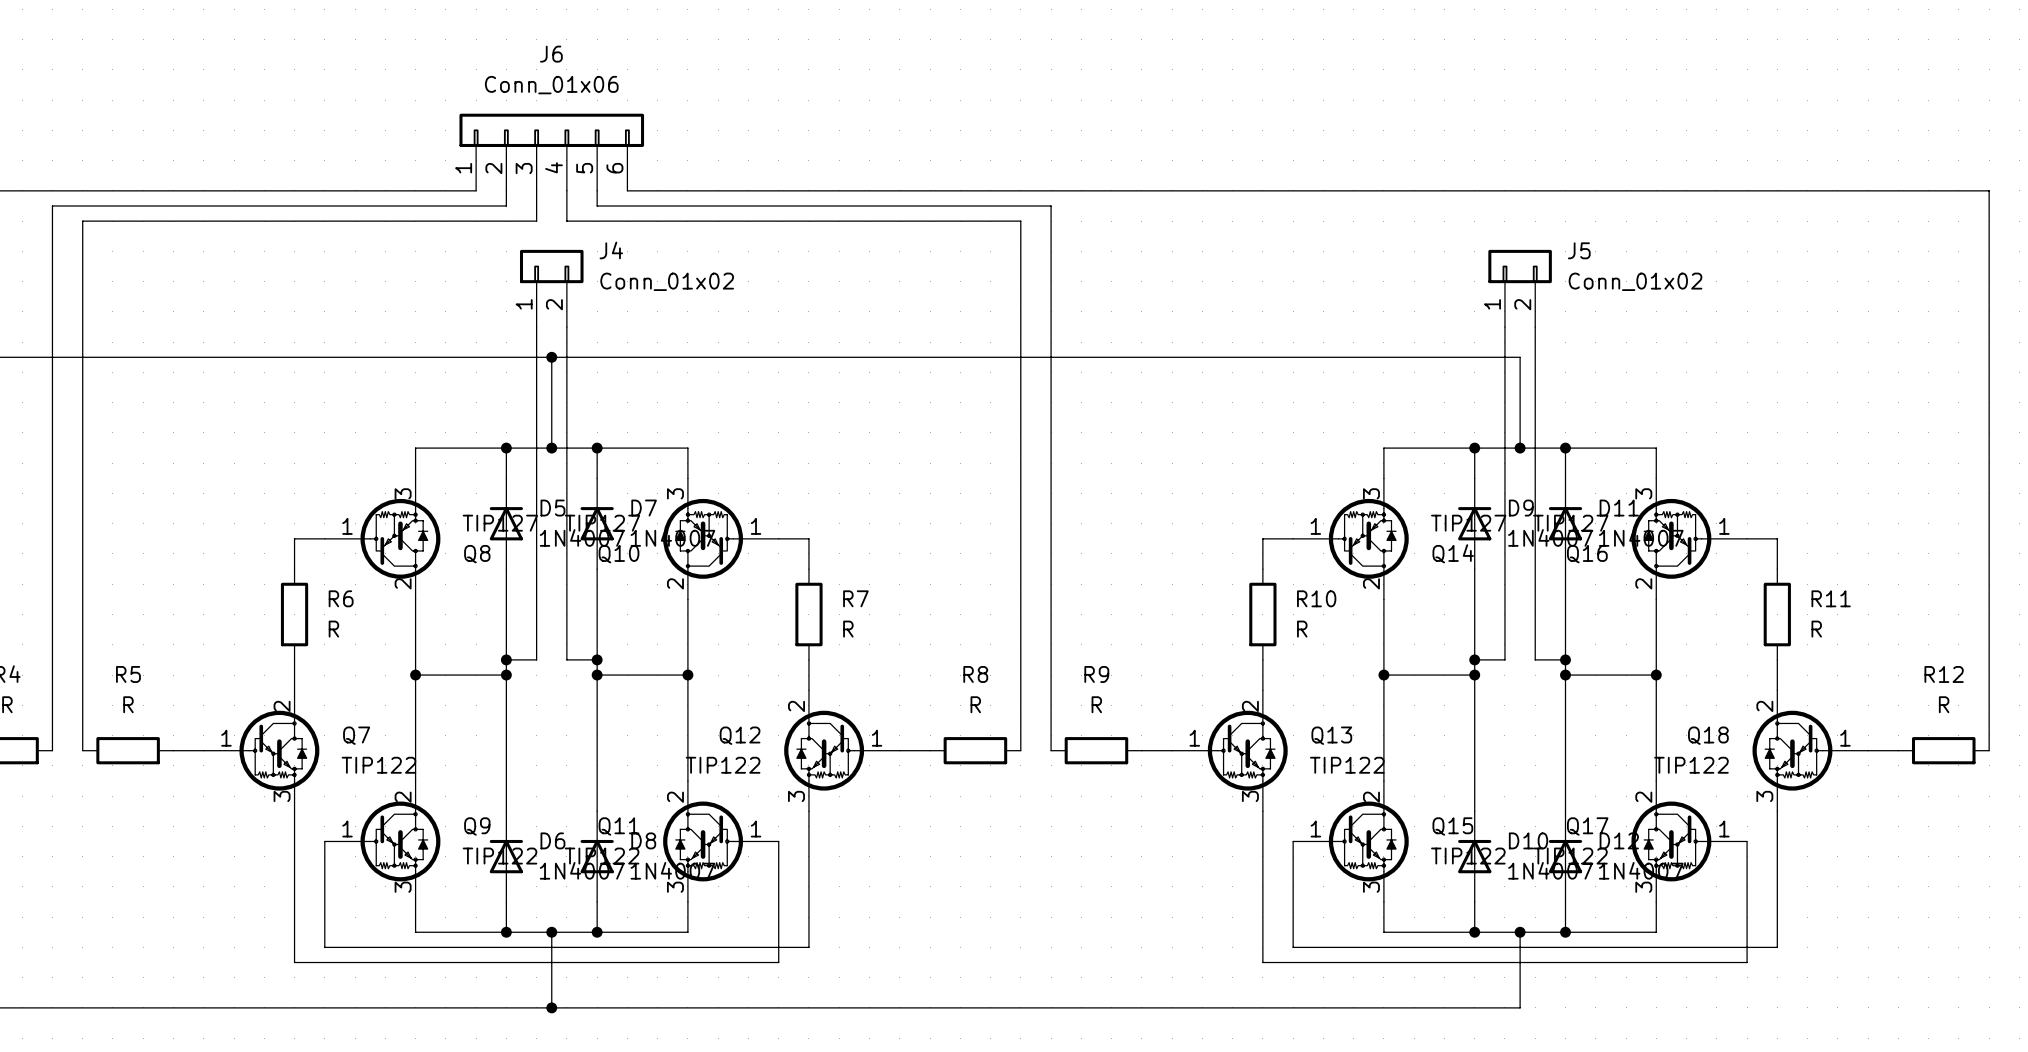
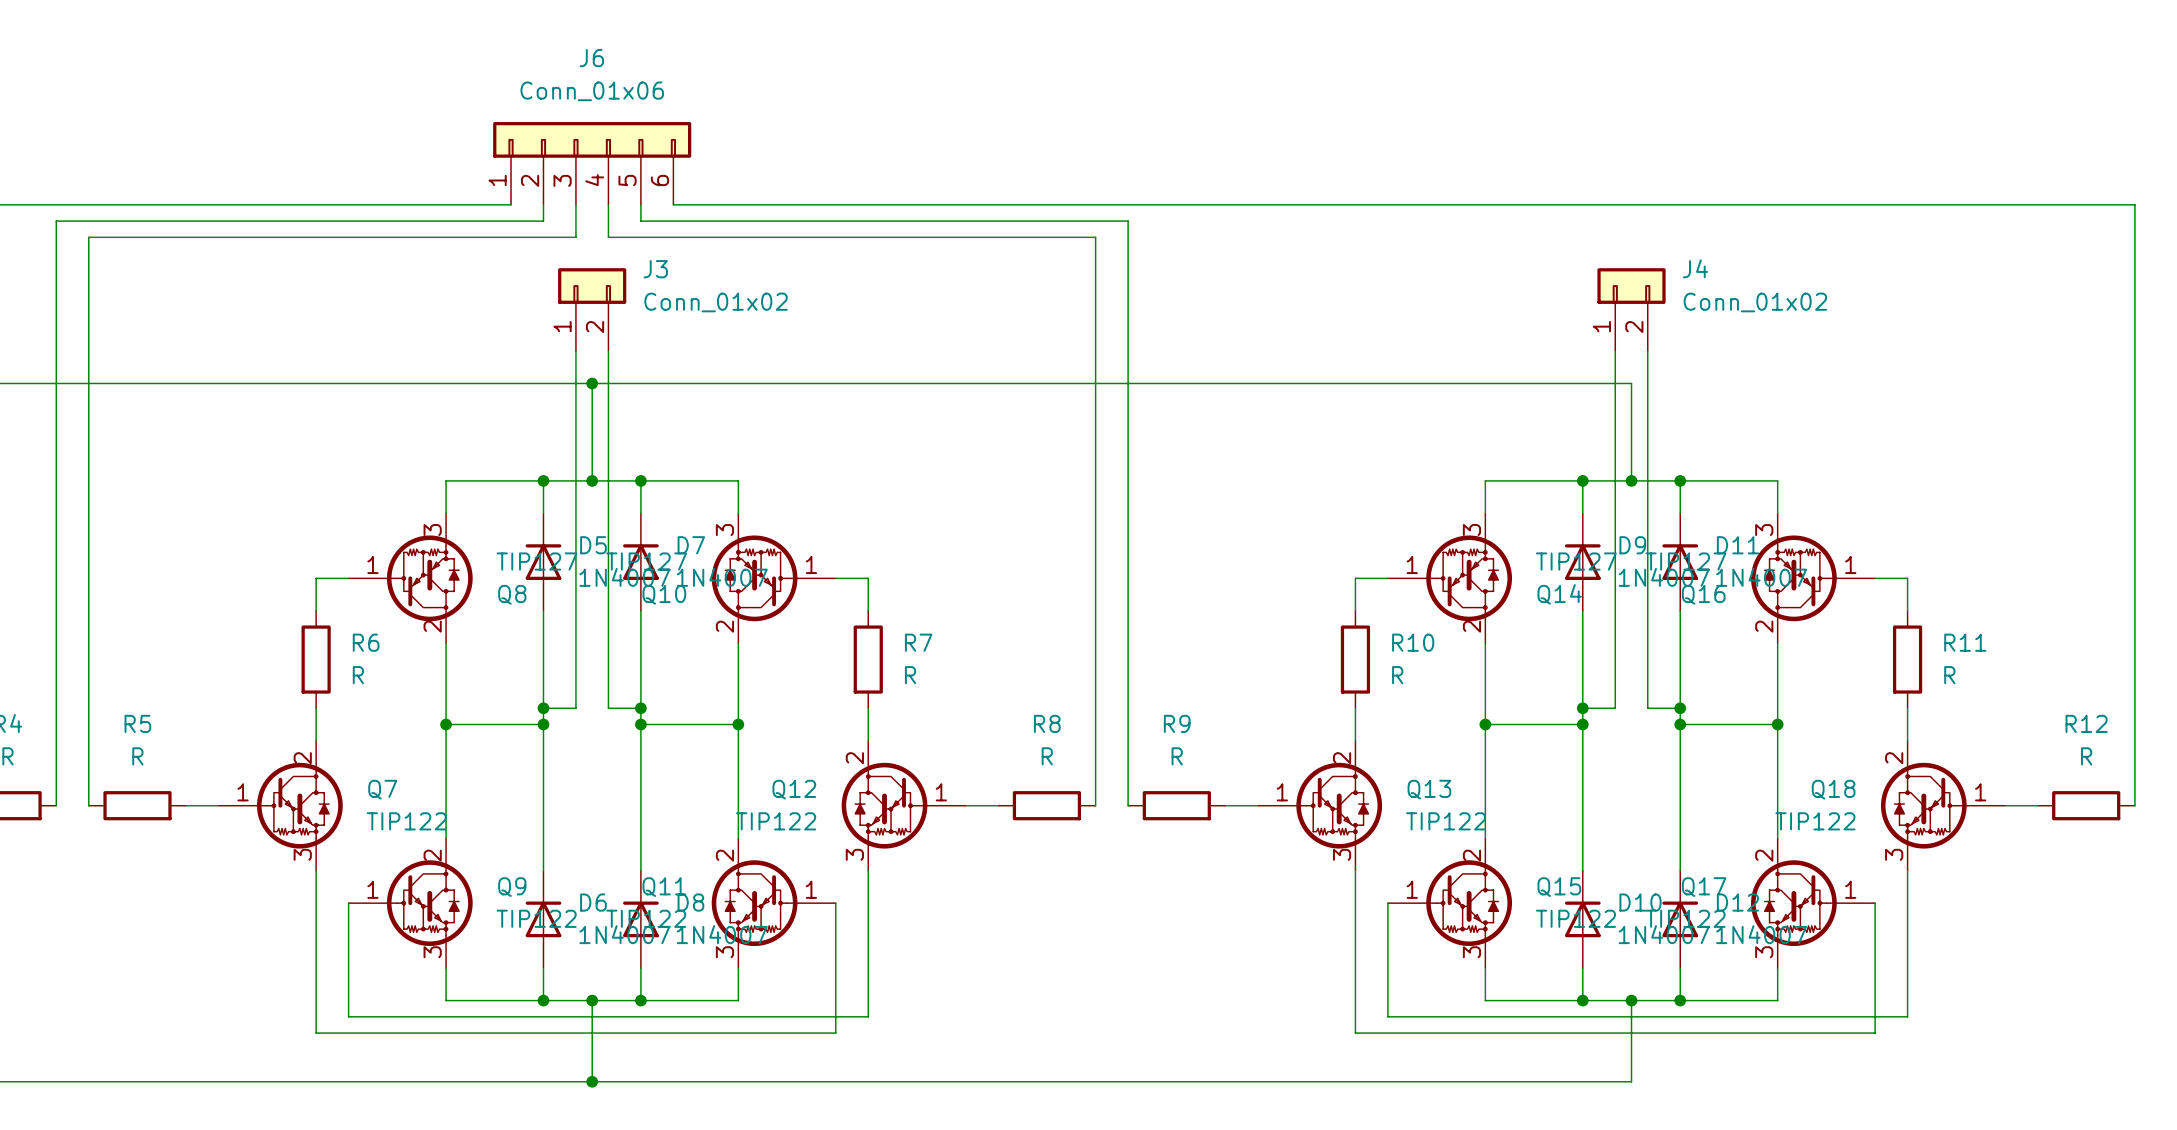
J4 name: J4 (611, 250) -> J3 (655, 269)
J5 name: J5 (1579, 250) -> J4 (1695, 268)

